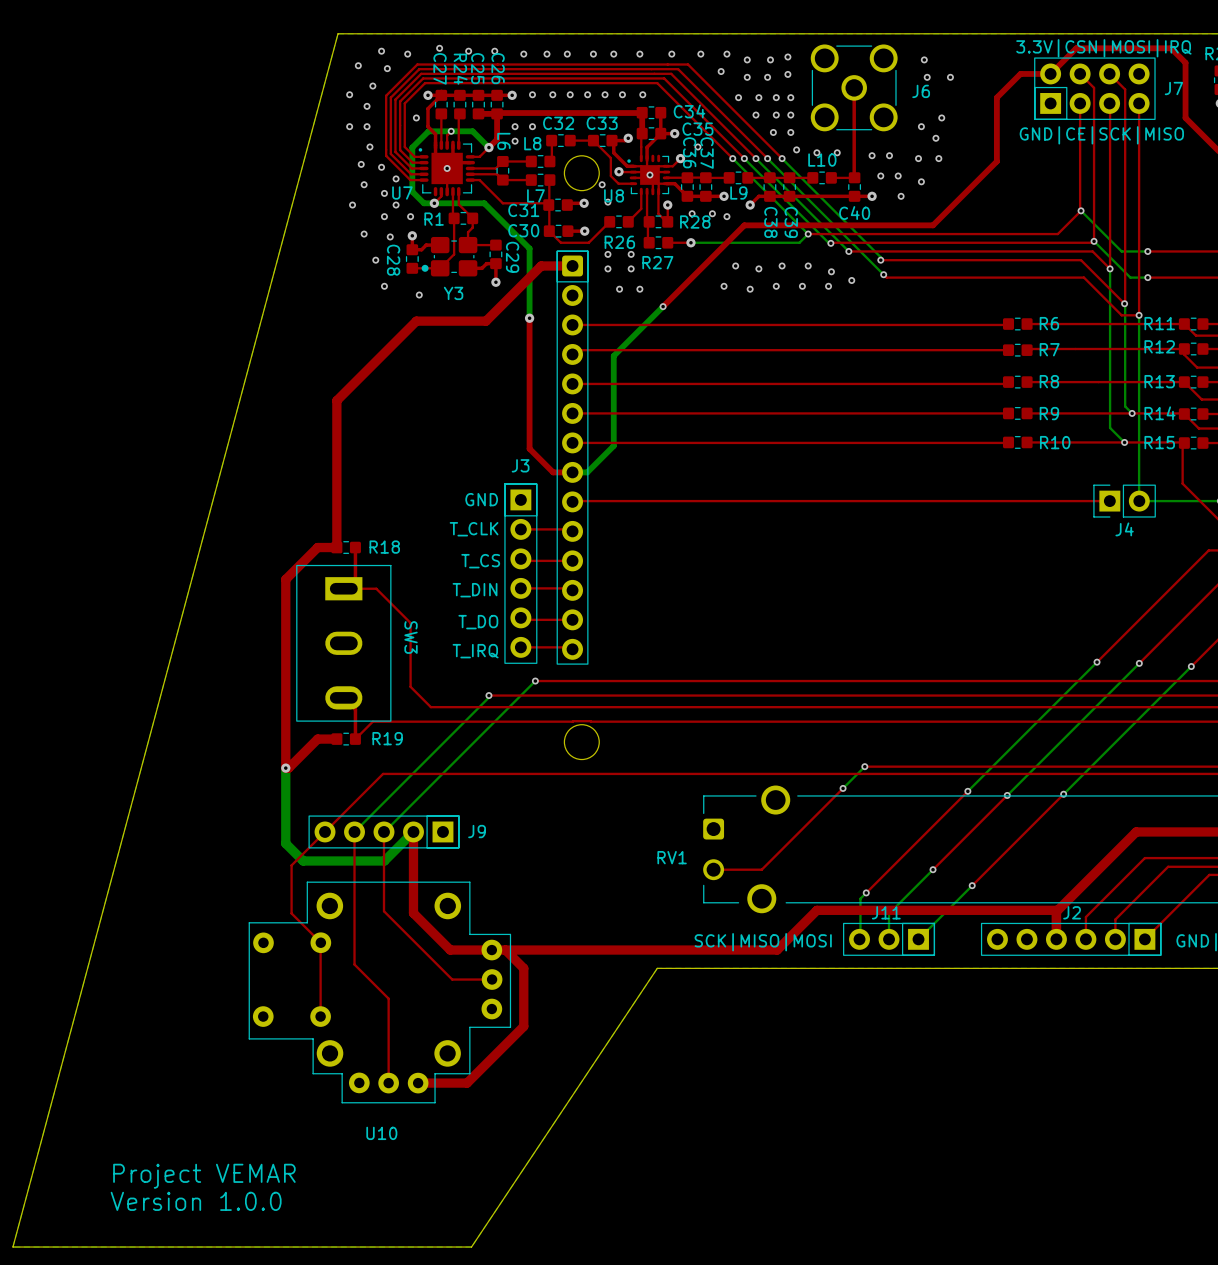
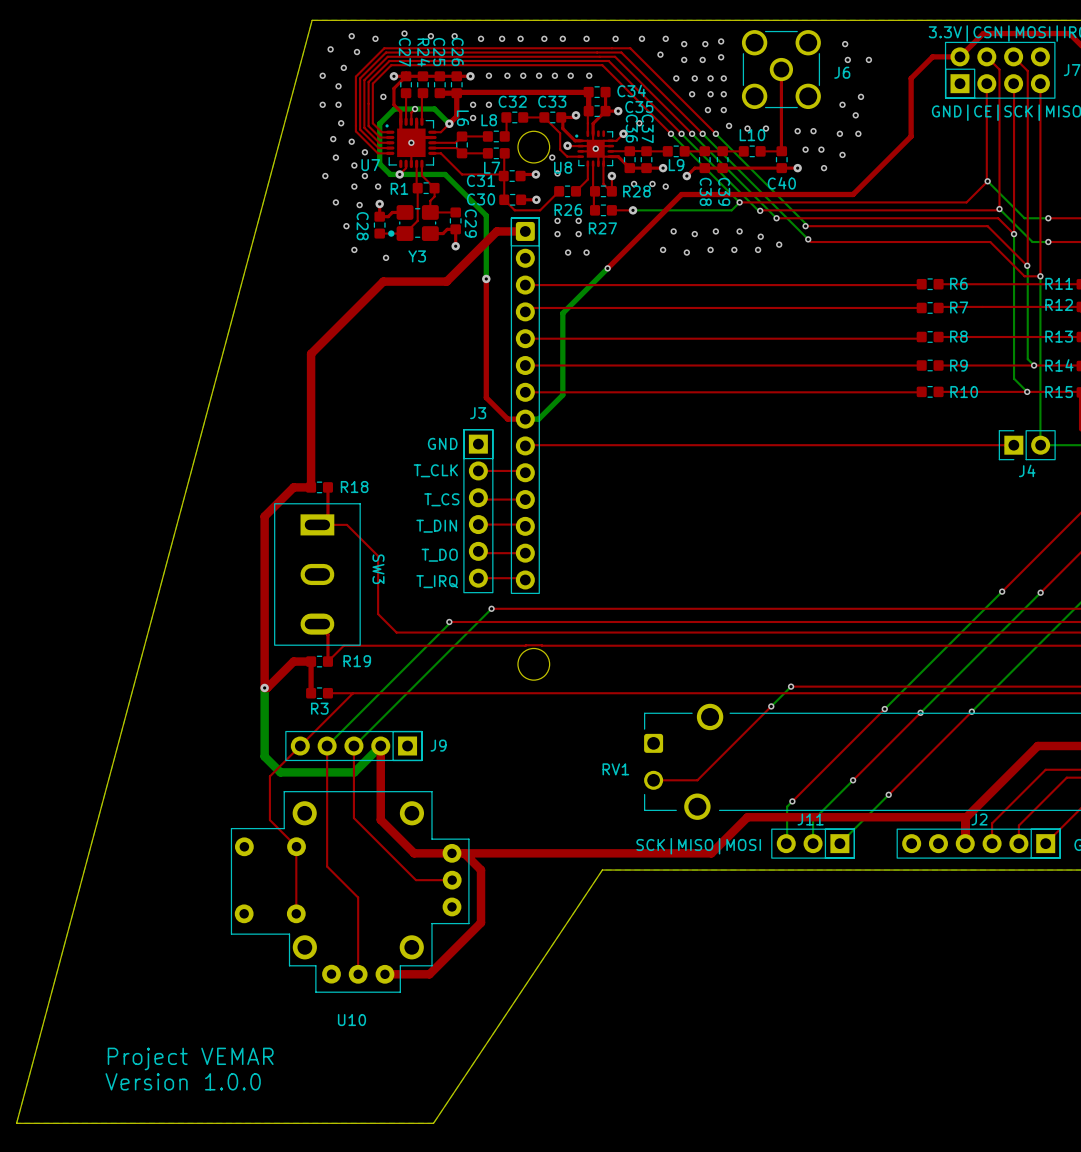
top track: none -> (311, 661) (311, 693)
R3: none -> (319, 693)
top track: none -> (327, 693) (353, 693)

